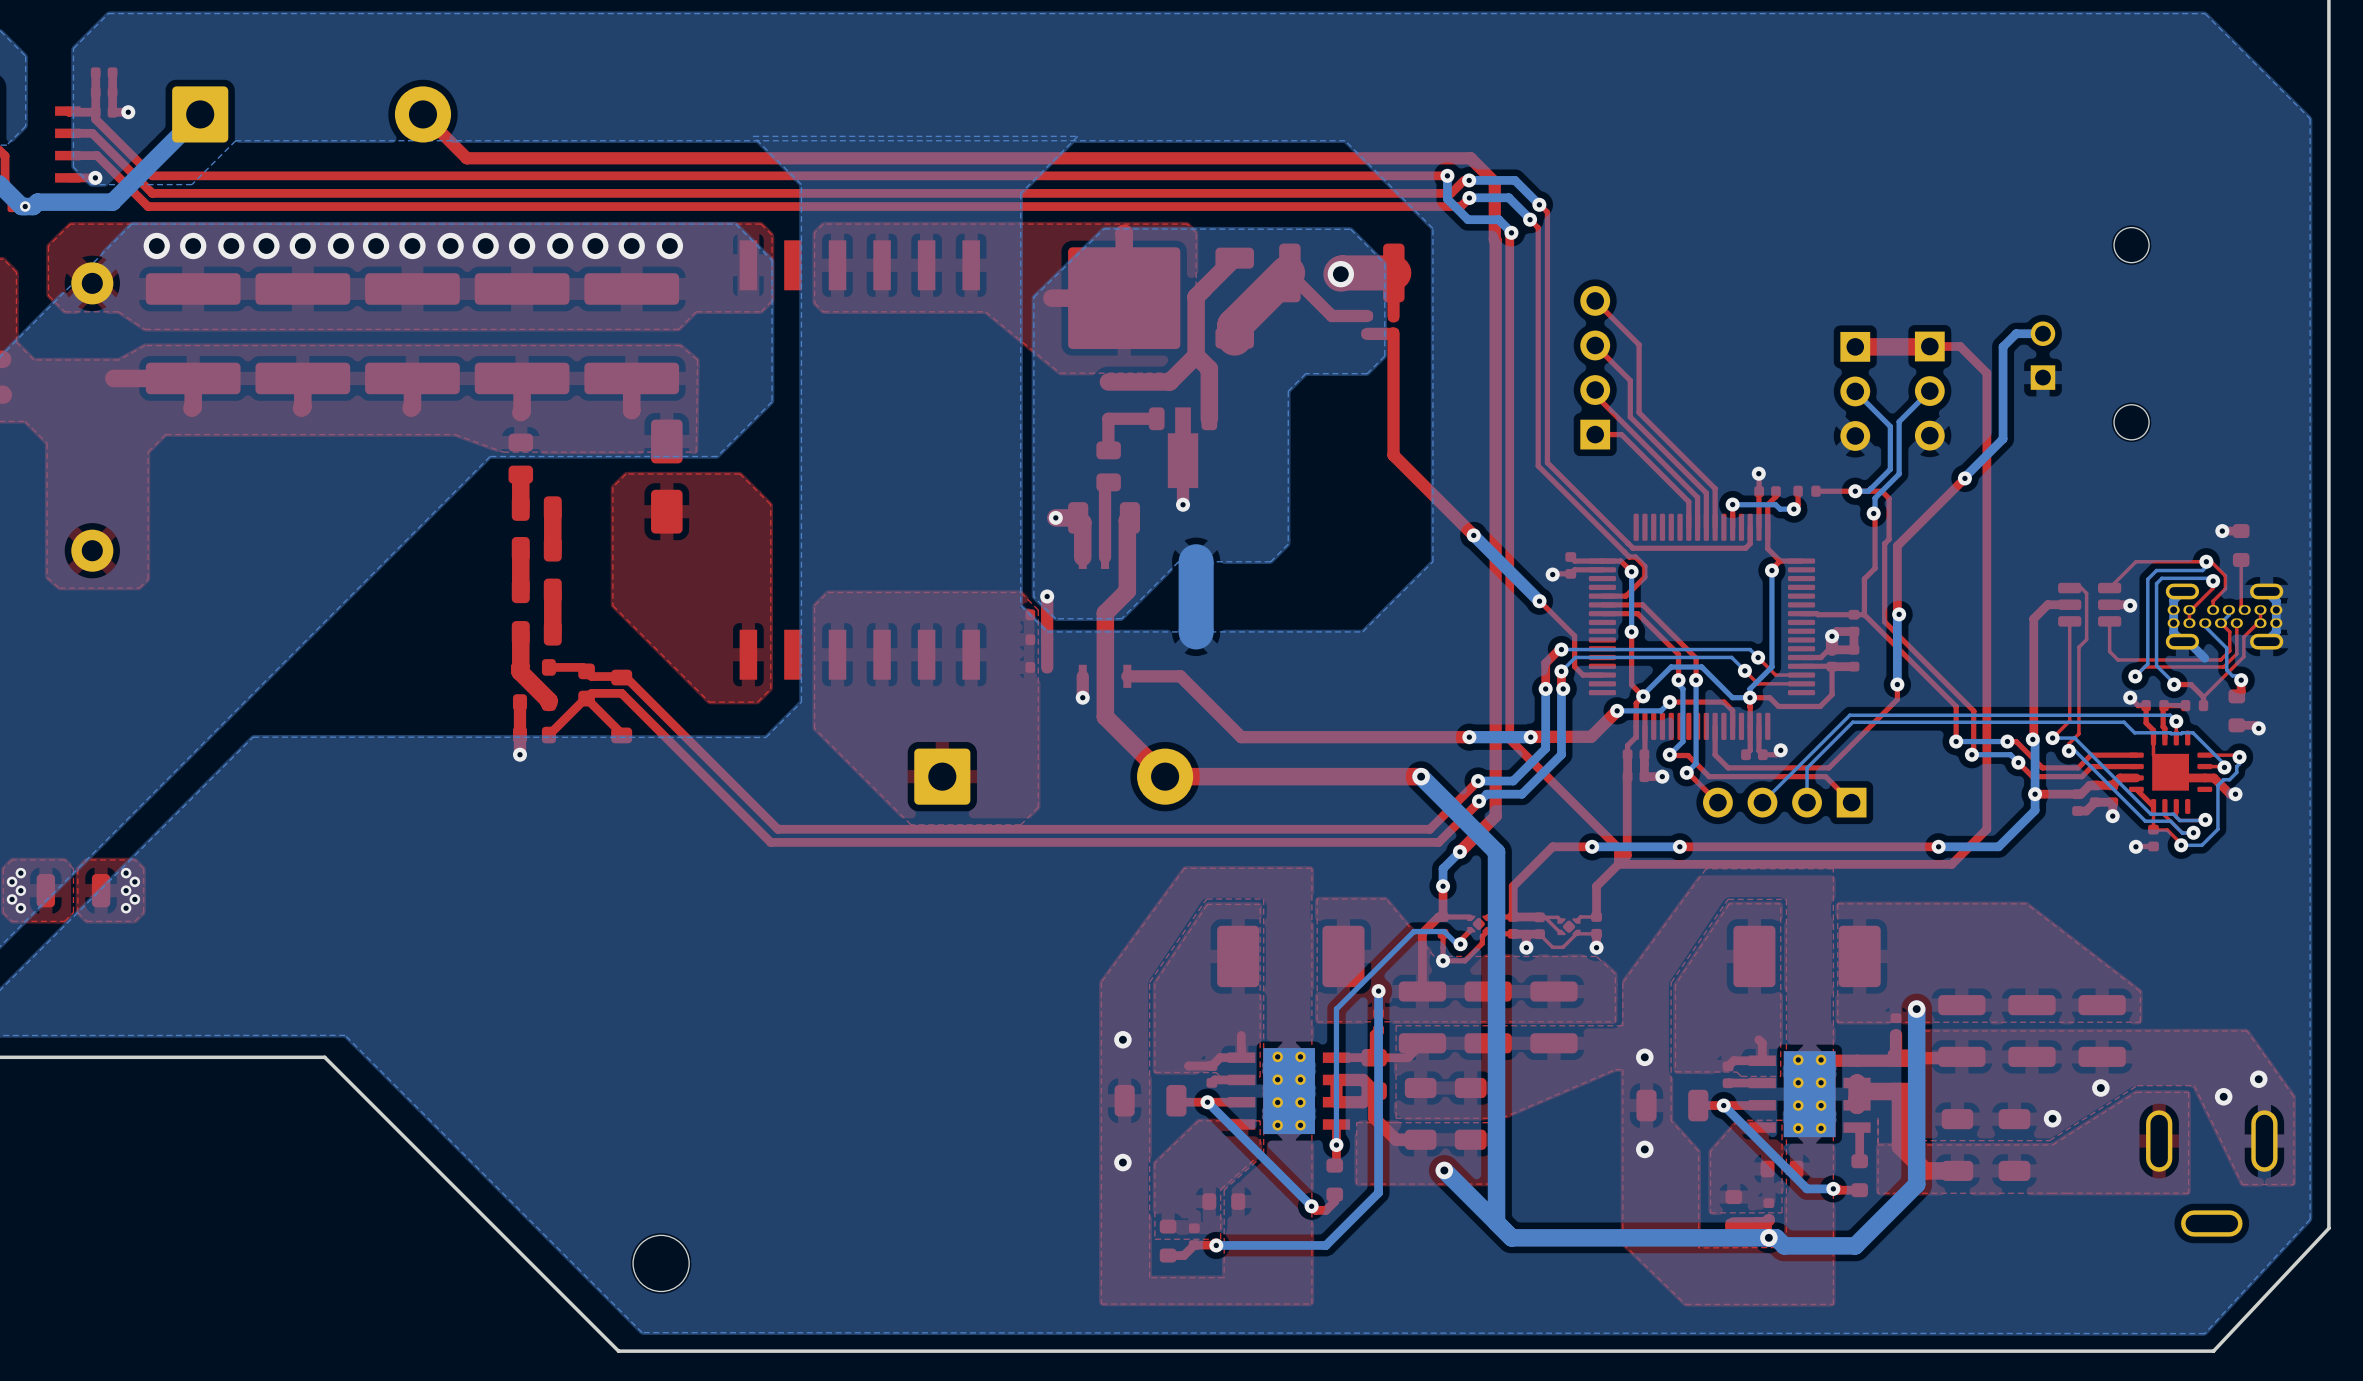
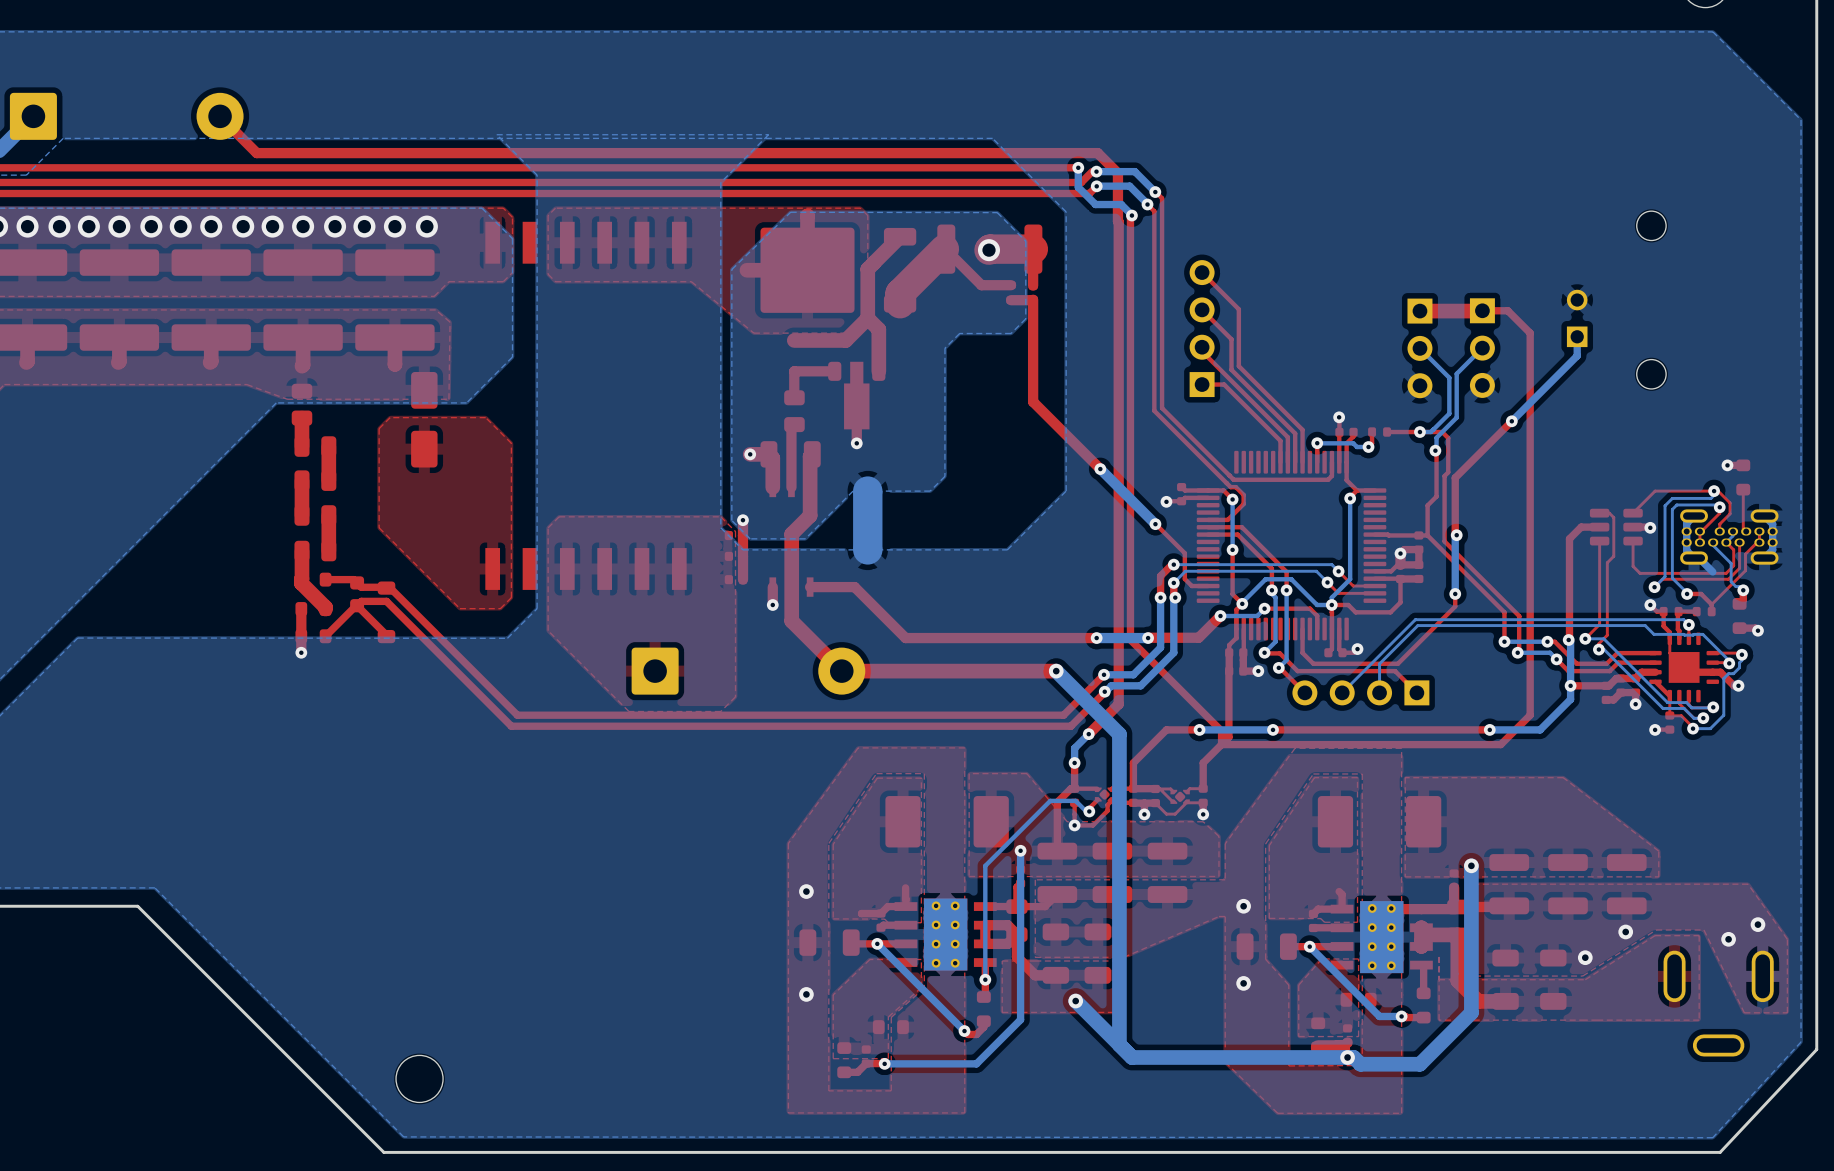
bottom track: (2042, 333) (2016, 333) (2003, 346) (2003, 438) (1964, 478) -> (1577, 336) (1577, 355) (1511, 421)

